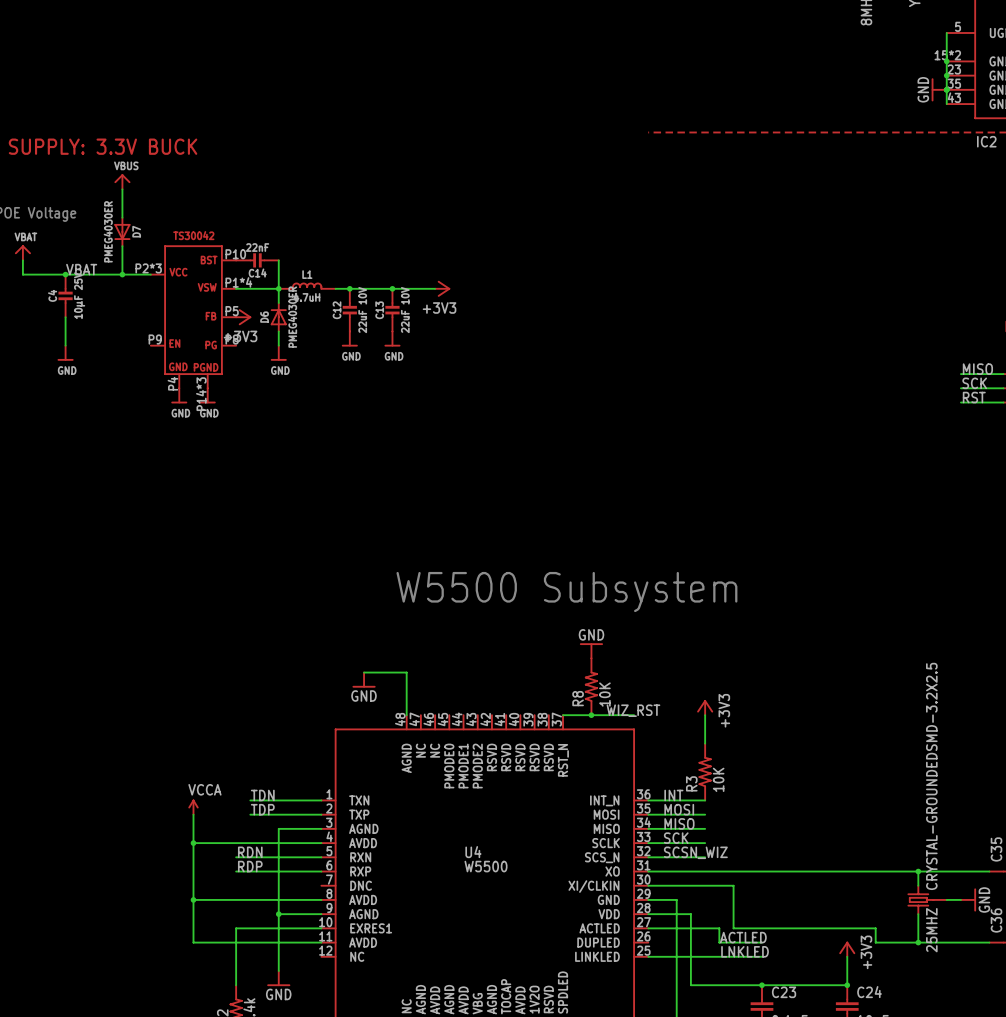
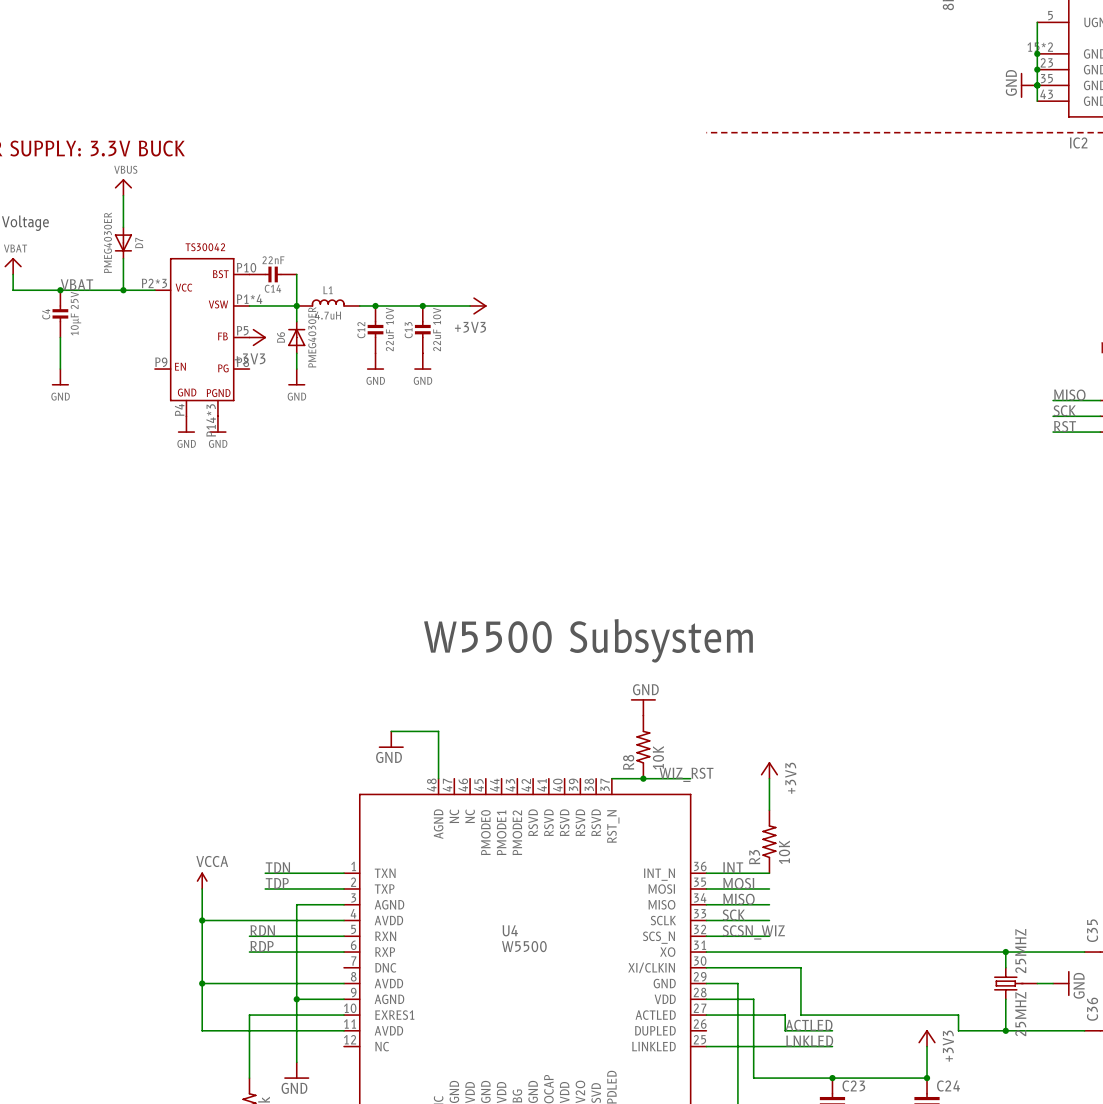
25MHZ value: CRYSTAL-GROUNDEDSMD-3.2X2.5 (931, 776) -> 25MHZ (1020, 951)

